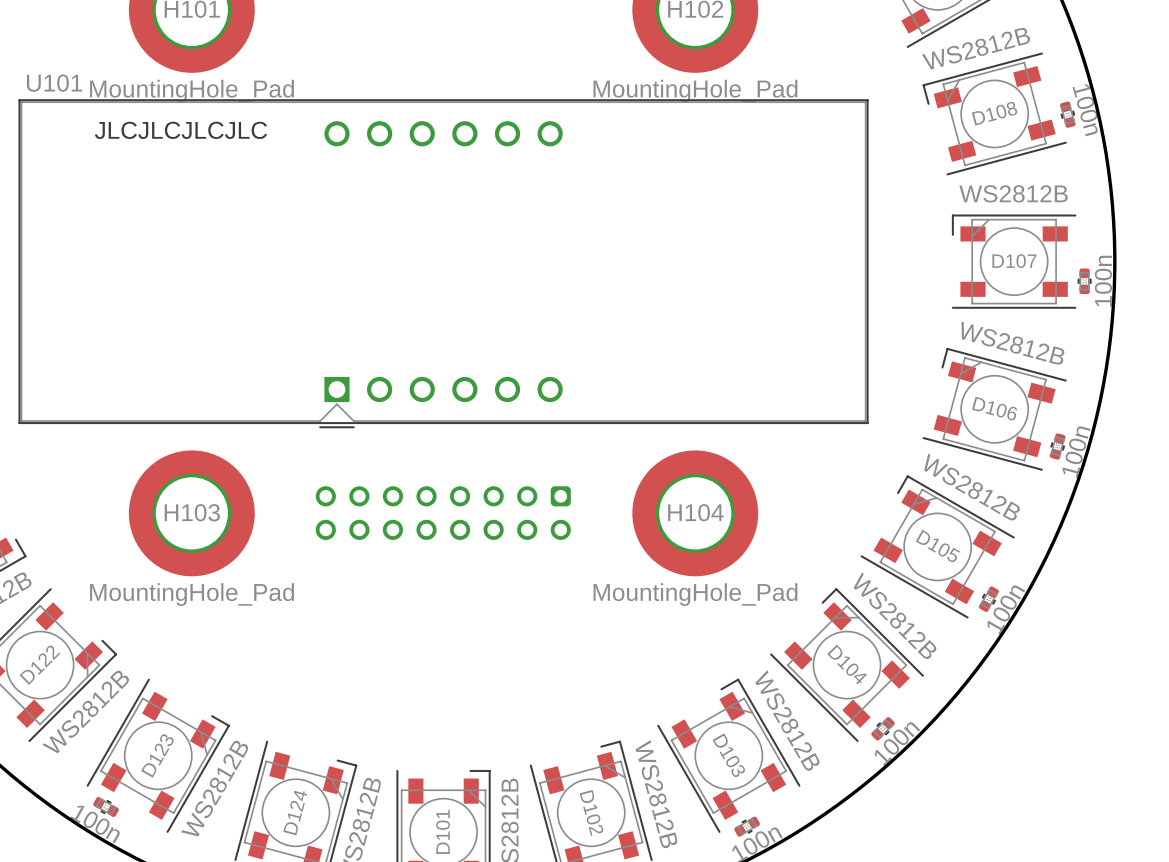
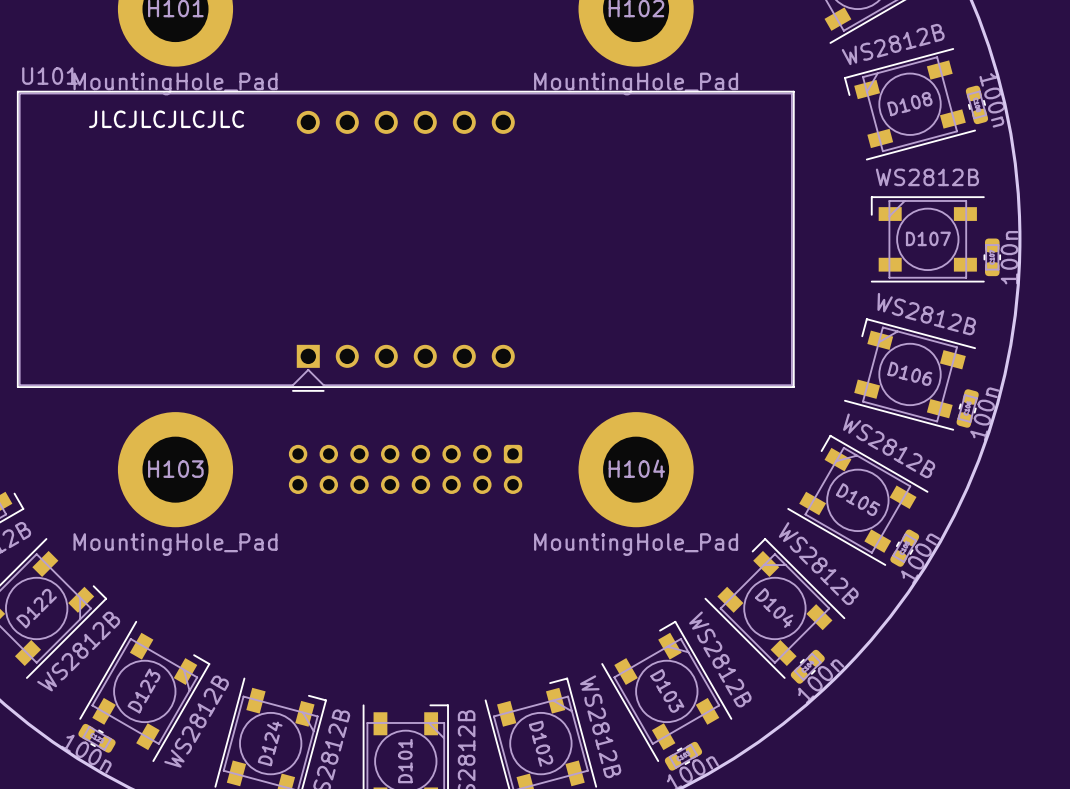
part footprint: [1060, 101, 1076, 128] -> [965, 85, 989, 125]
part footprint: [1077, 268, 1092, 295] -> [983, 238, 1002, 277]
part footprint: [1049, 433, 1066, 460] -> [956, 389, 979, 428]
part footprint: [978, 586, 999, 612] -> [890, 529, 920, 567]
part footprint: [871, 717, 895, 741] -> [790, 649, 825, 684]
part footprint: [93, 796, 119, 818] -> [78, 723, 116, 753]
part footprint: [734, 816, 760, 837] -> [664, 741, 703, 771]

